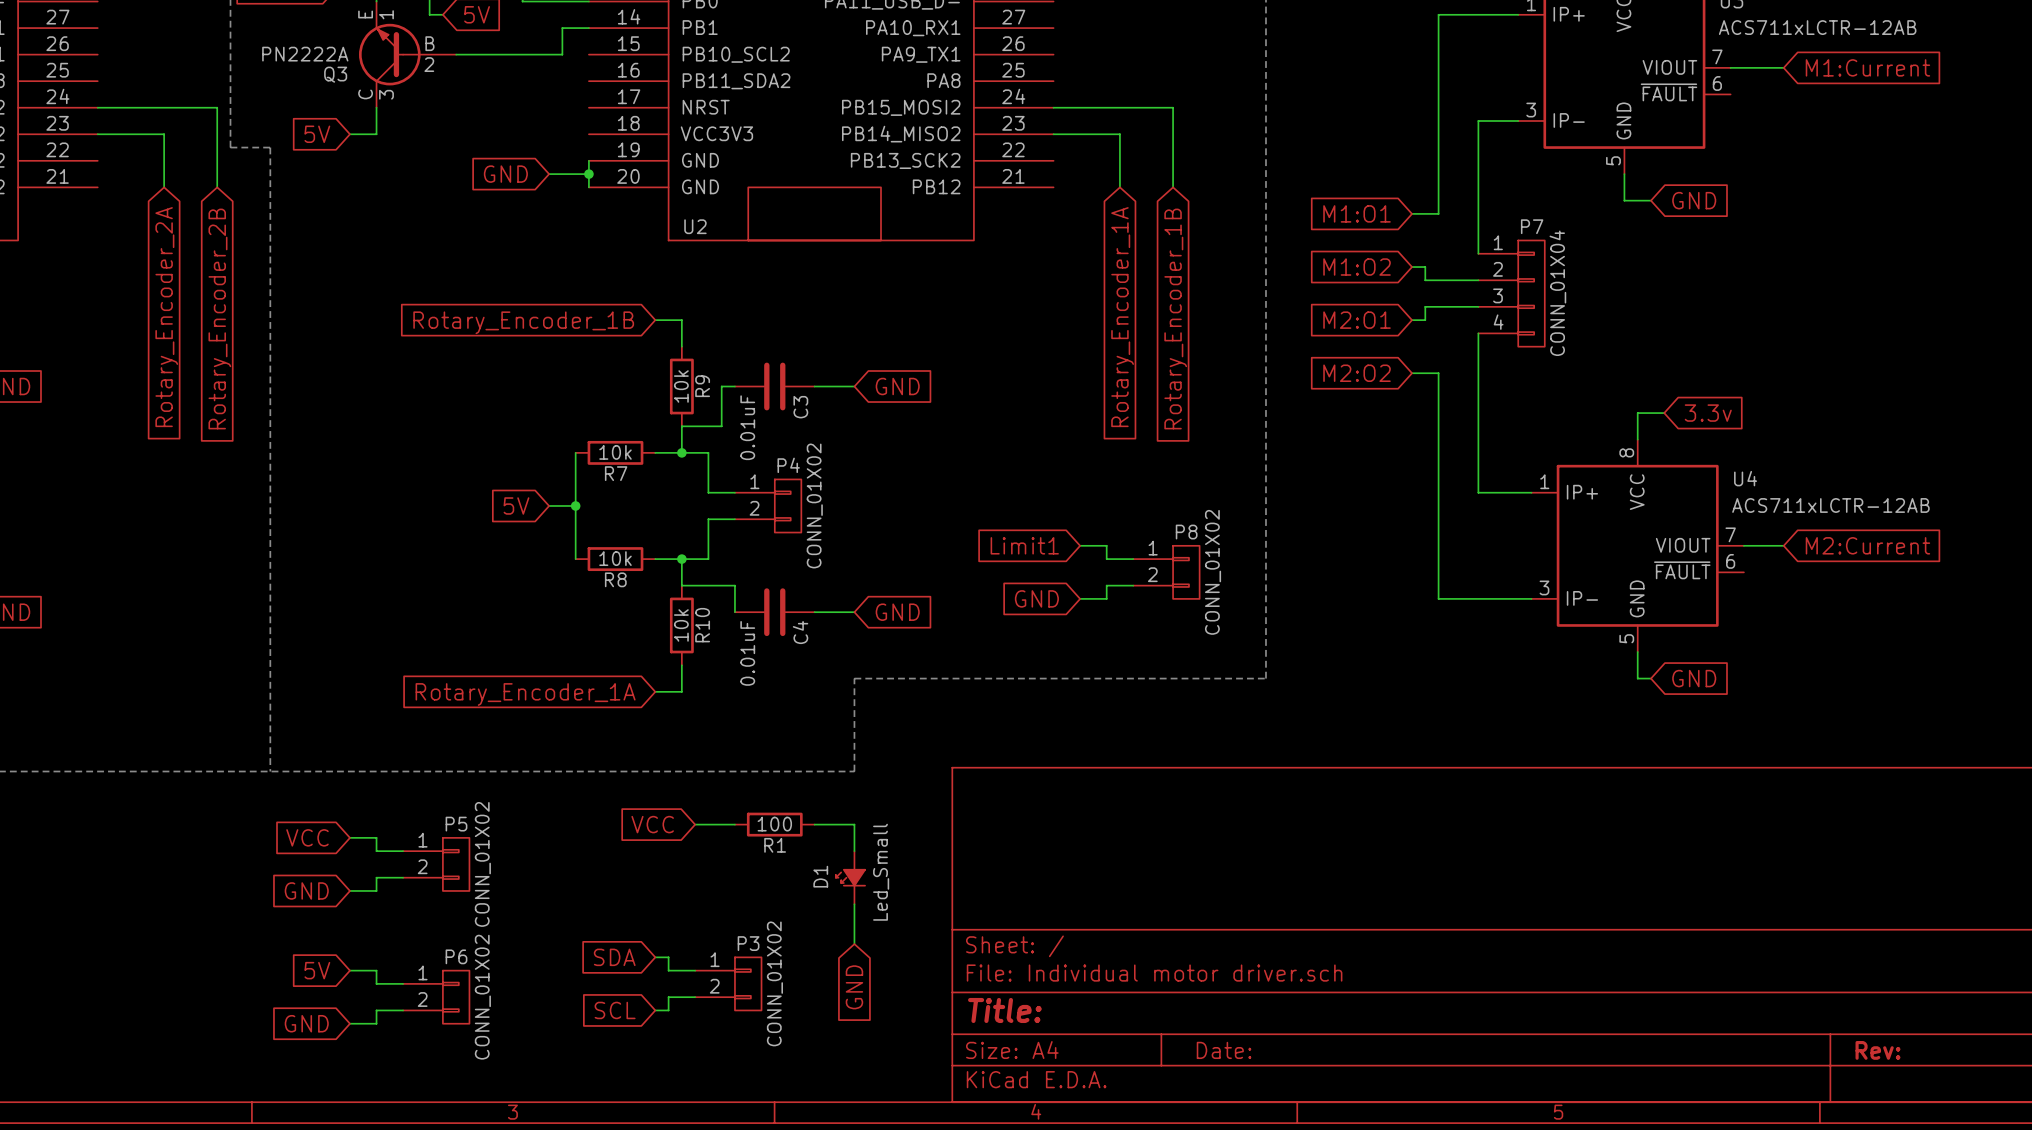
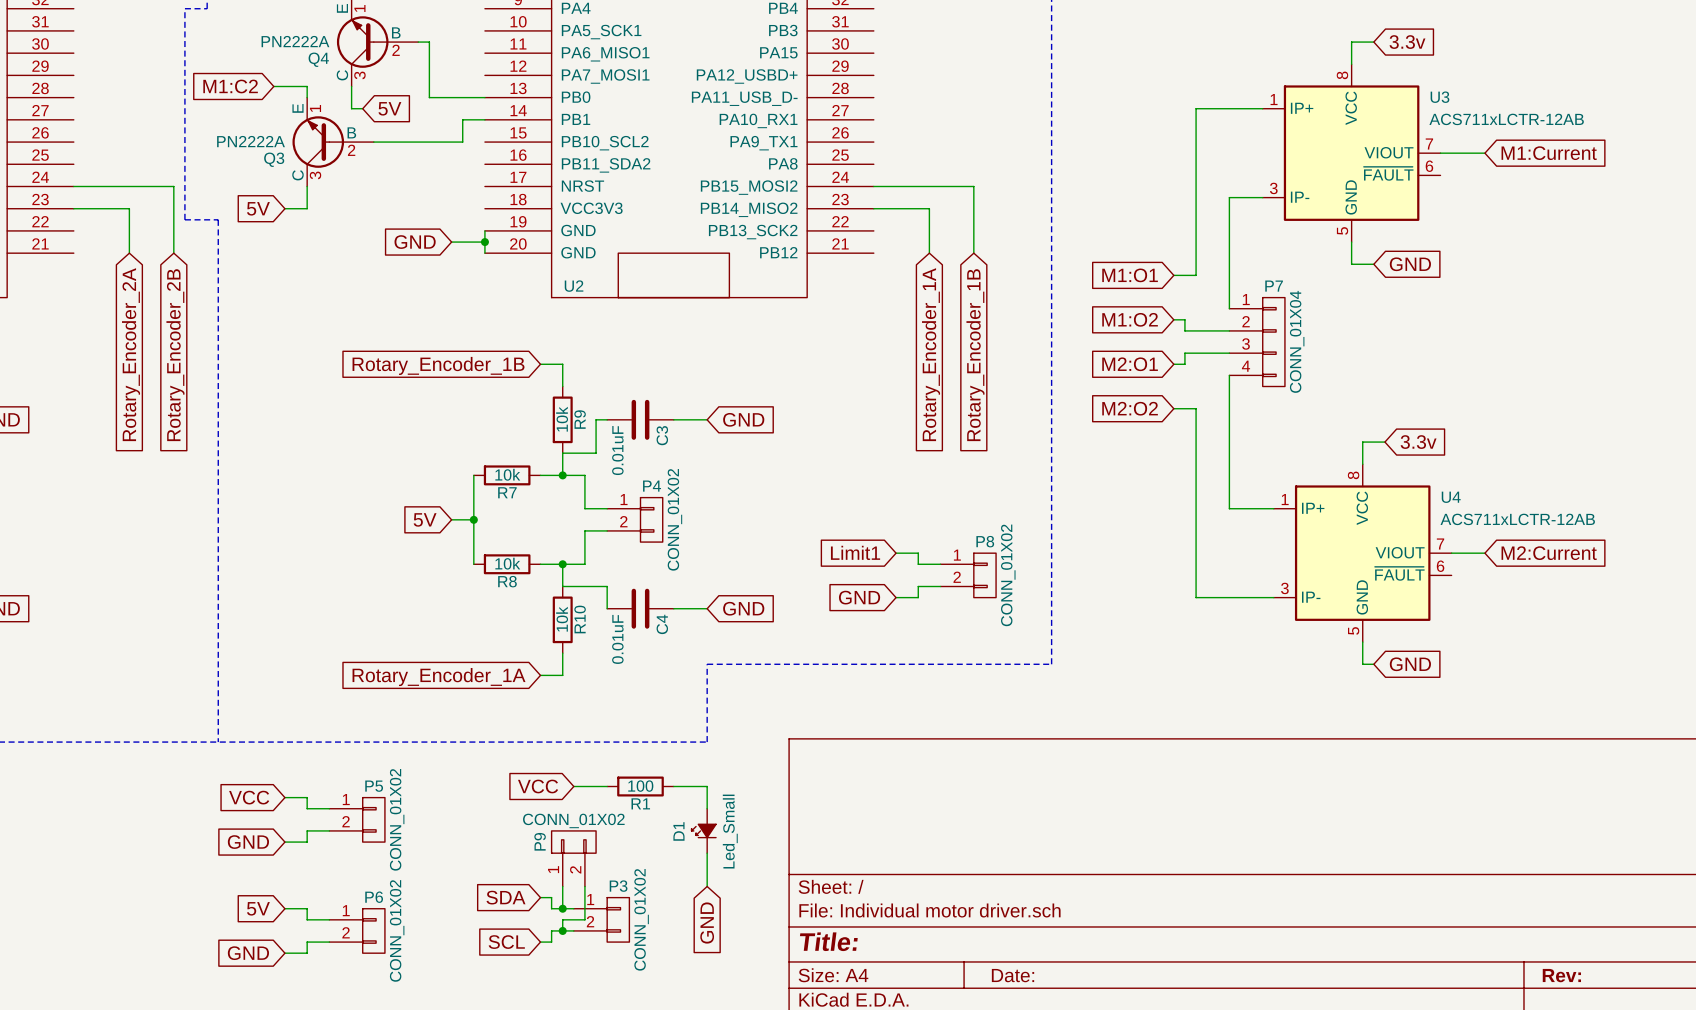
P9: none -> CONN_01X02 (573, 858)
wire: none -> (562, 886) (562, 908)
wire: none -> (584, 886) (584, 919) (562, 919) (562, 930)
junction: none -> (562, 908)
junction: none -> (562, 930)

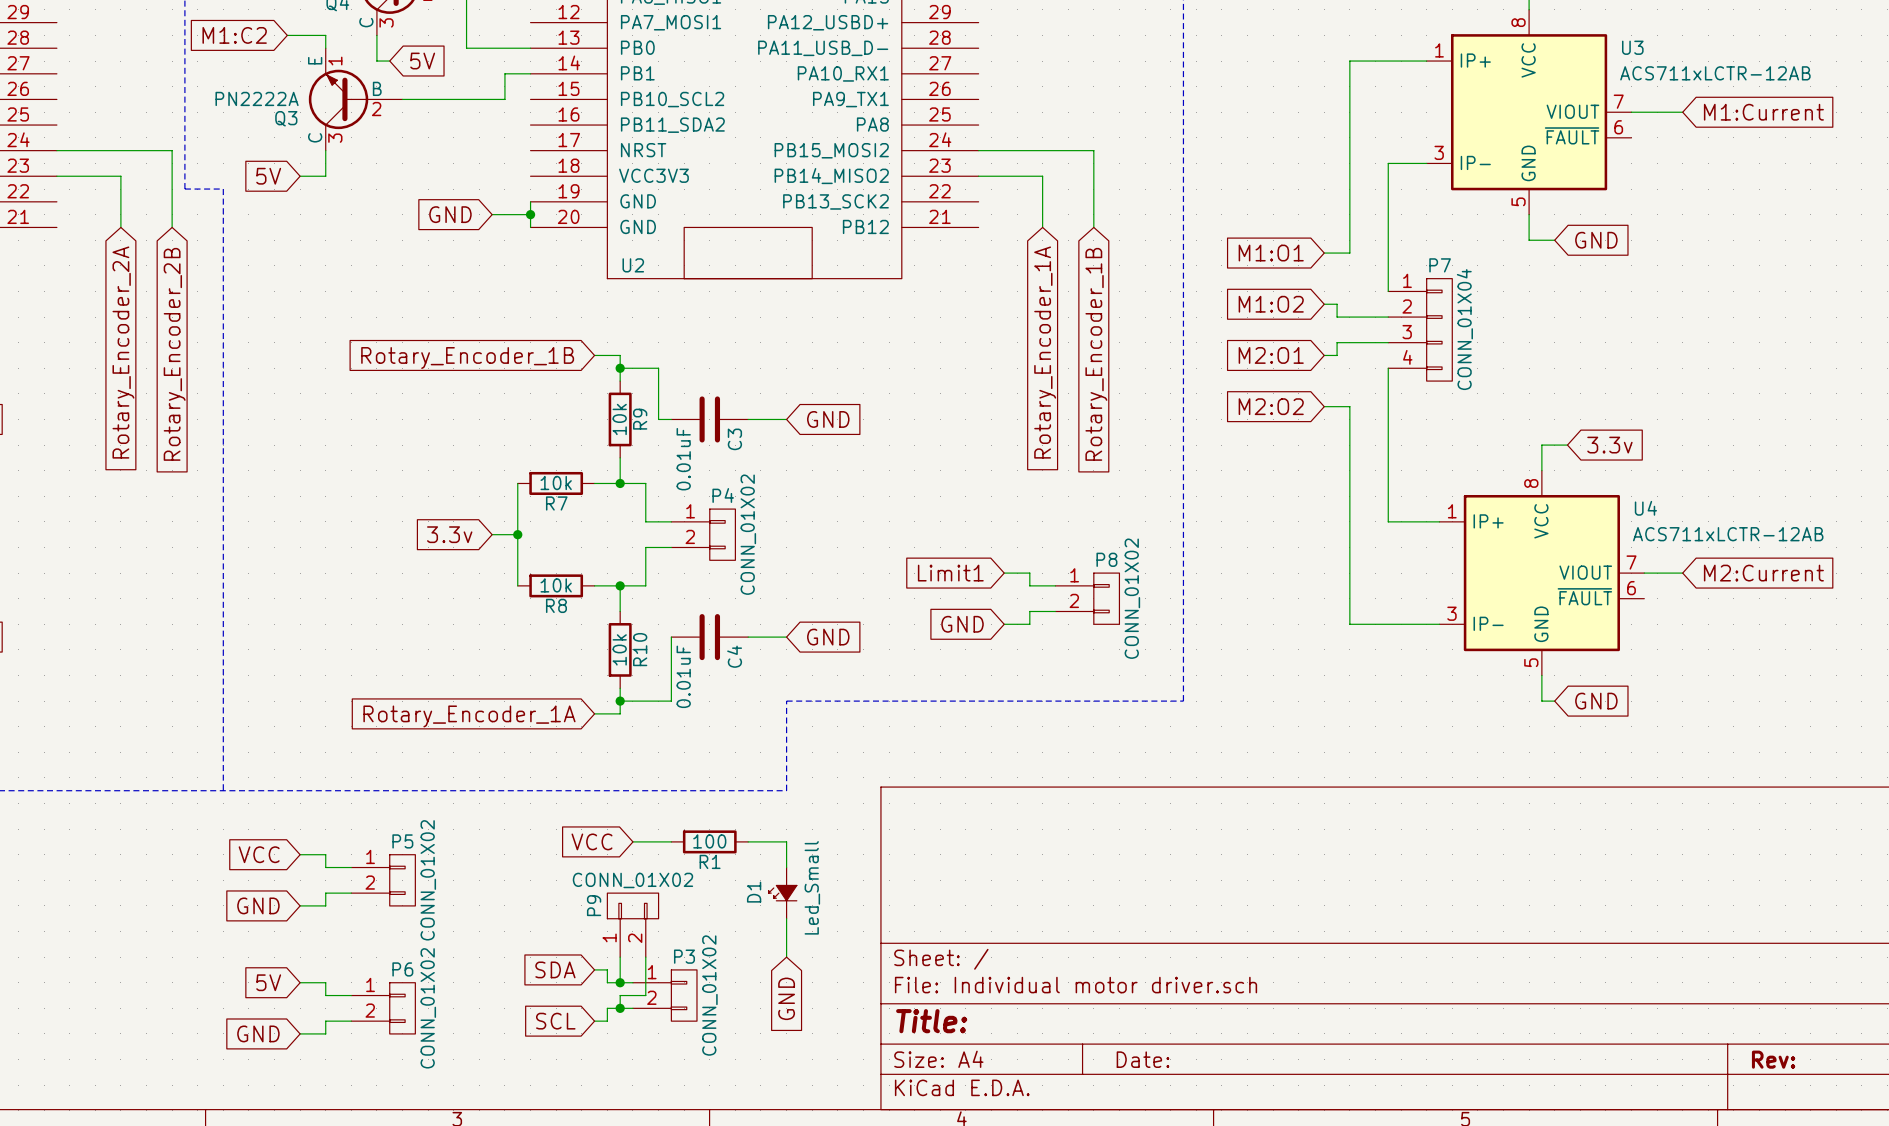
junction: none -> (620, 368)
wire: (596, 419) (596, 453) (562, 453) -> (658, 419) (658, 368) (620, 368)
global label: 5V (425, 519) -> 3.3v (449, 534)
wire: (562, 586) (607, 586) (607, 608) -> (620, 701) (671, 701) (671, 637)
junction: none -> (620, 701)

